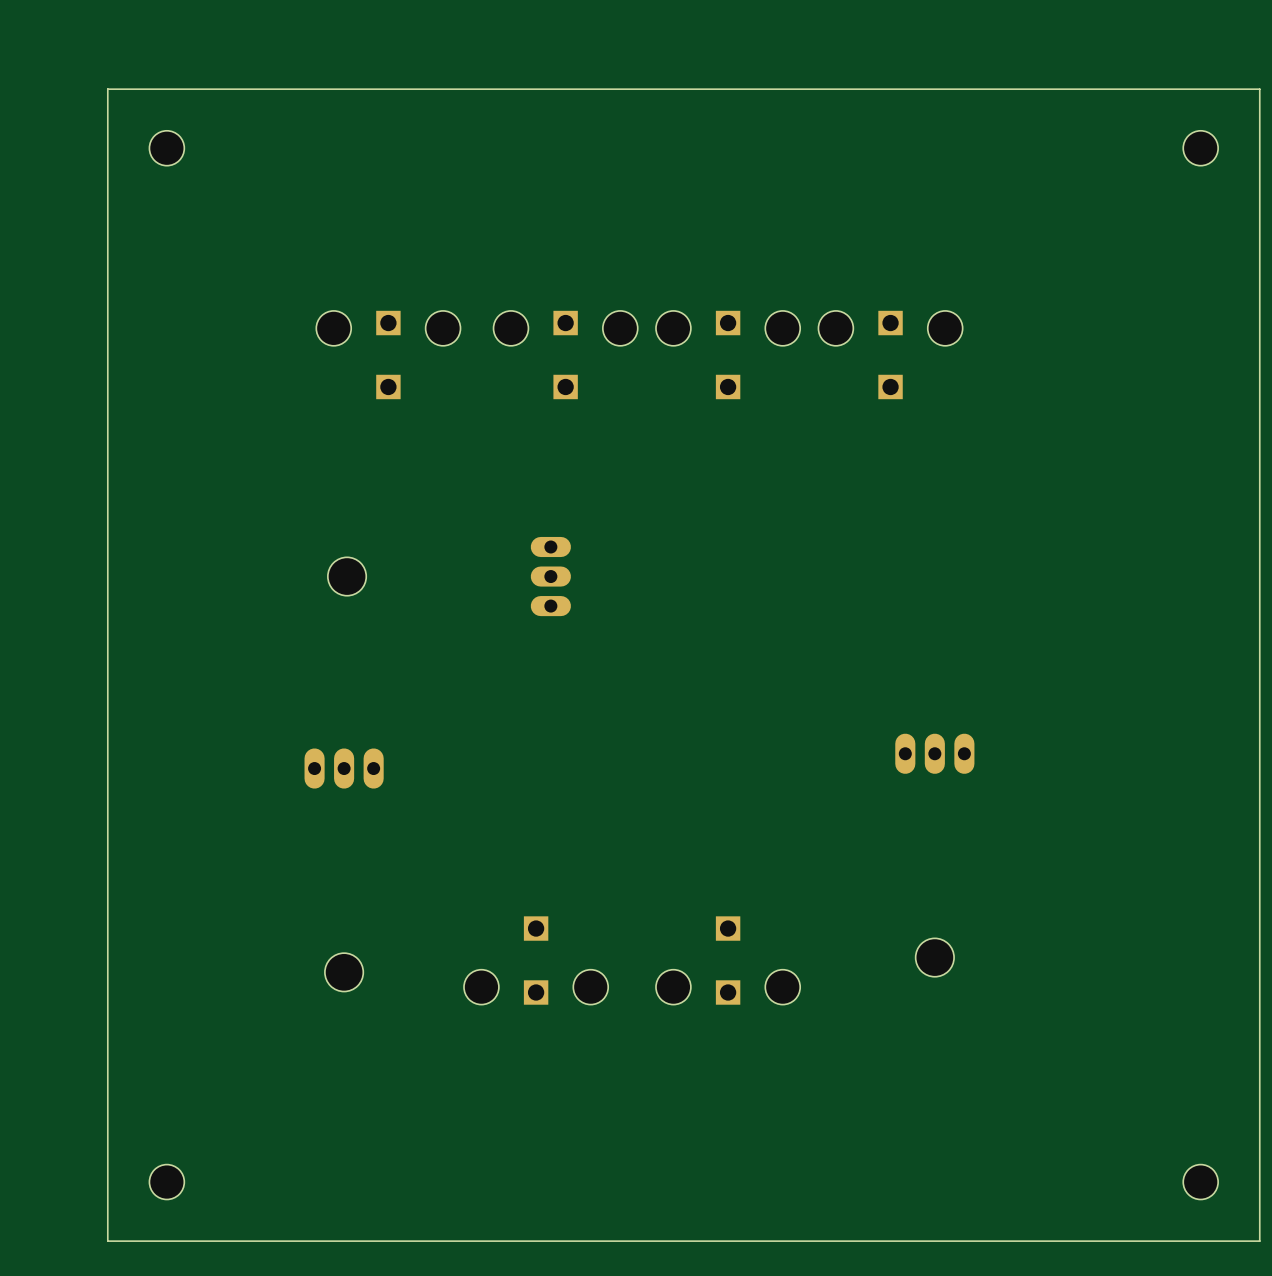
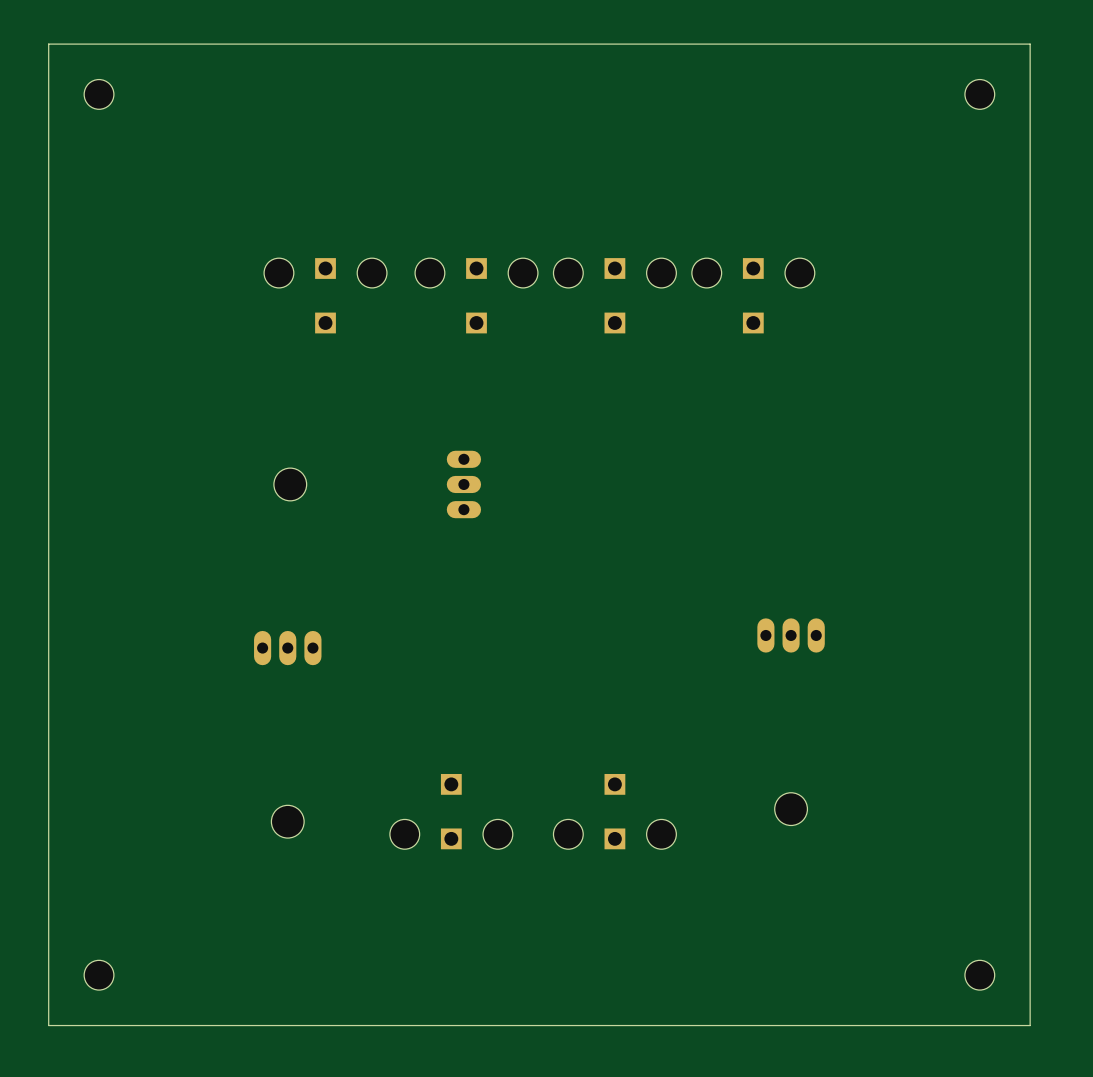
board edge: (1259, 89) (107, 89) (107, 1241) (1259, 1241) (1259, 89) -> (1030, 44) (48, 44) (48, 1025) (1030, 1025) (1030, 44)
hole position: (166, 148) -> (99, 94)
hole position: (1200, 148) -> (979, 94)
hole position: (166, 1182) -> (99, 975)
hole position: (1200, 1182) -> (979, 975)

